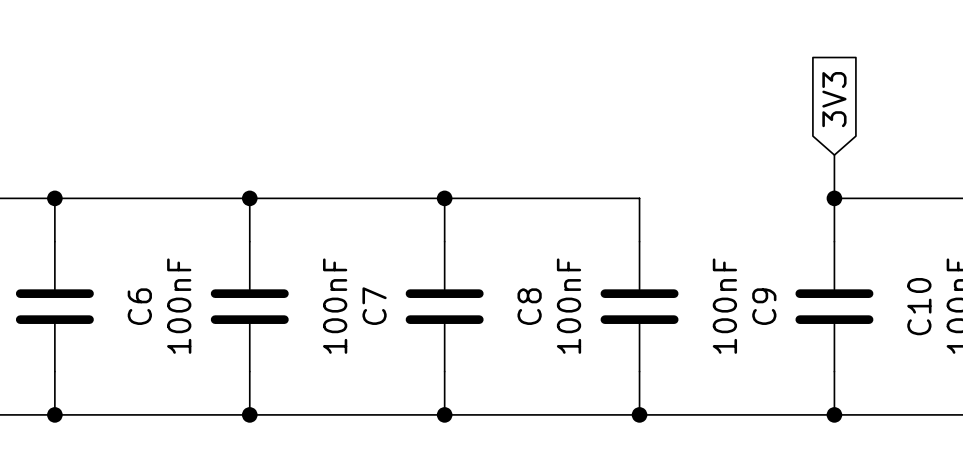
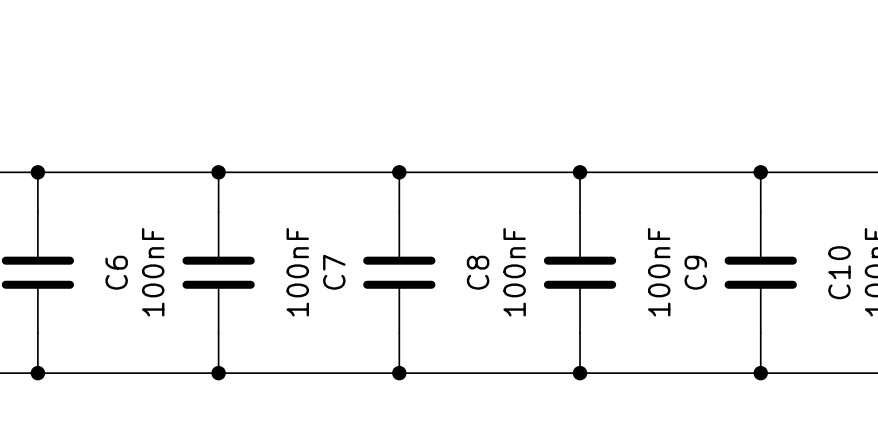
global label: 3V3 (834, 99) -> none
wire: (834, 155) (834, 198) -> (580, 172) (760, 172)
junction: none -> (580, 172)

